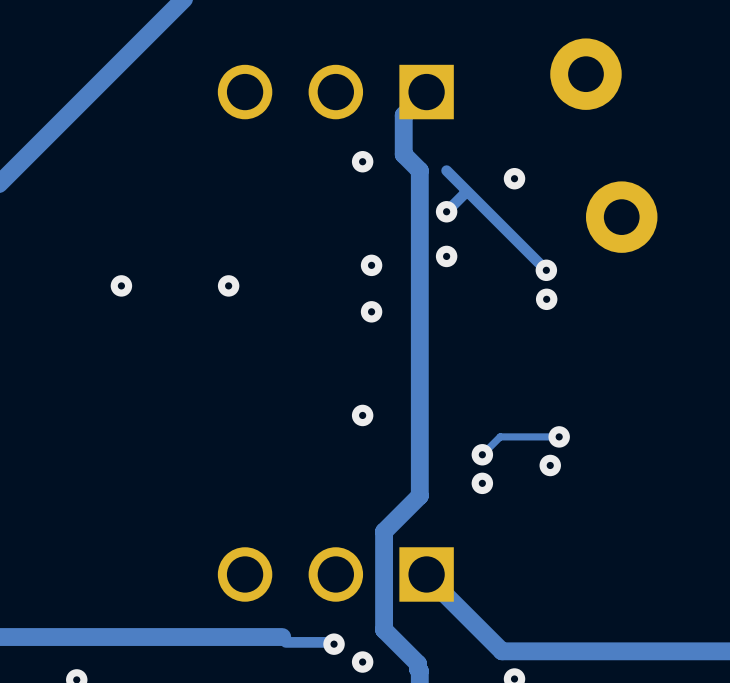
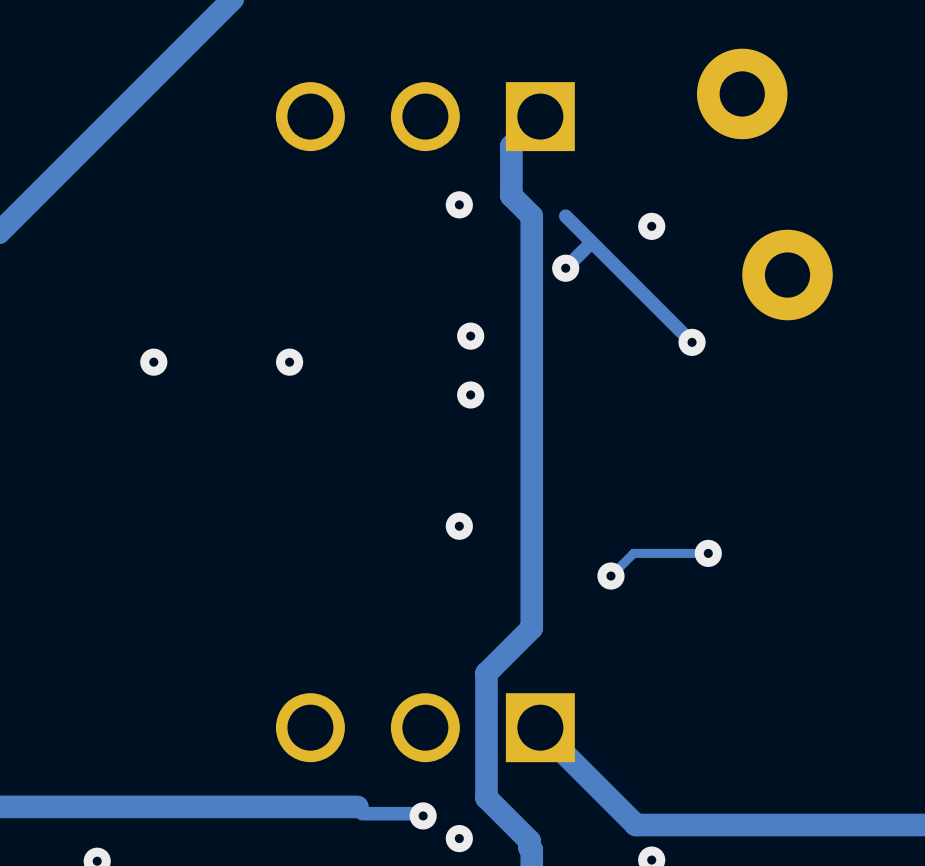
via: (446, 256) -> none
via: (546, 299) -> none
via: (550, 465) -> none
via: (482, 483) -> none

